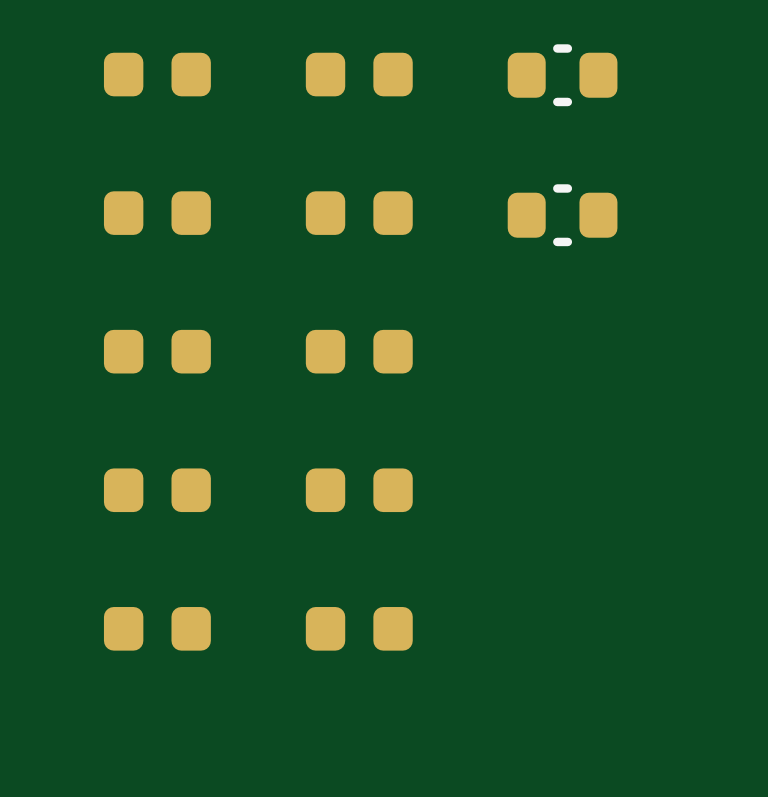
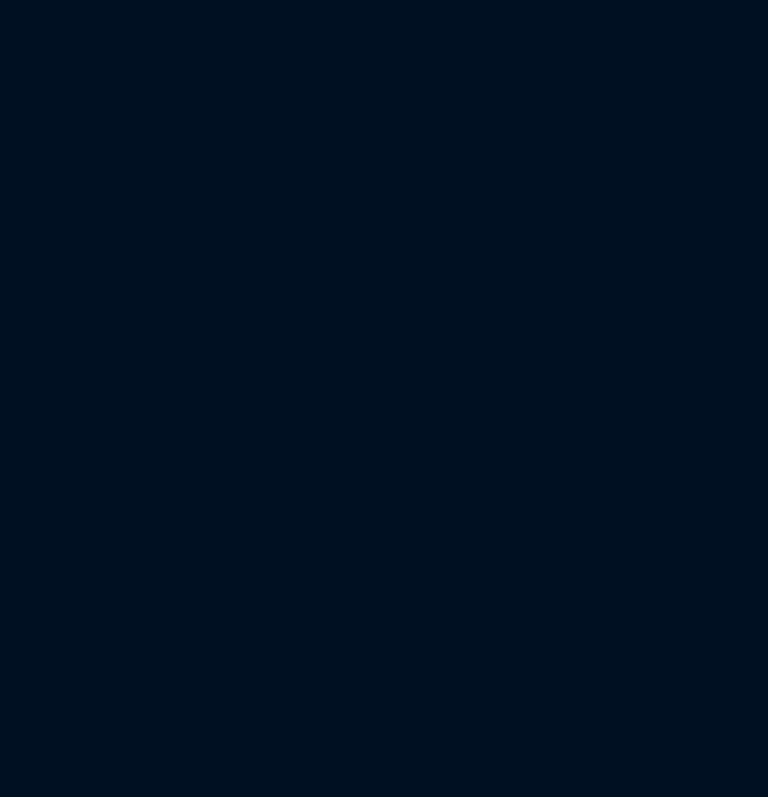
part: (157, 74) -> none
part: (359, 74) -> none
part: (562, 75) -> none
part: (157, 213) -> none
part: (359, 213) -> none
part: (562, 215) -> none
part: (157, 351) -> none
part: (359, 351) -> none
part: (157, 490) -> none
part: (359, 490) -> none
part: (157, 628) -> none
part: (359, 628) -> none

